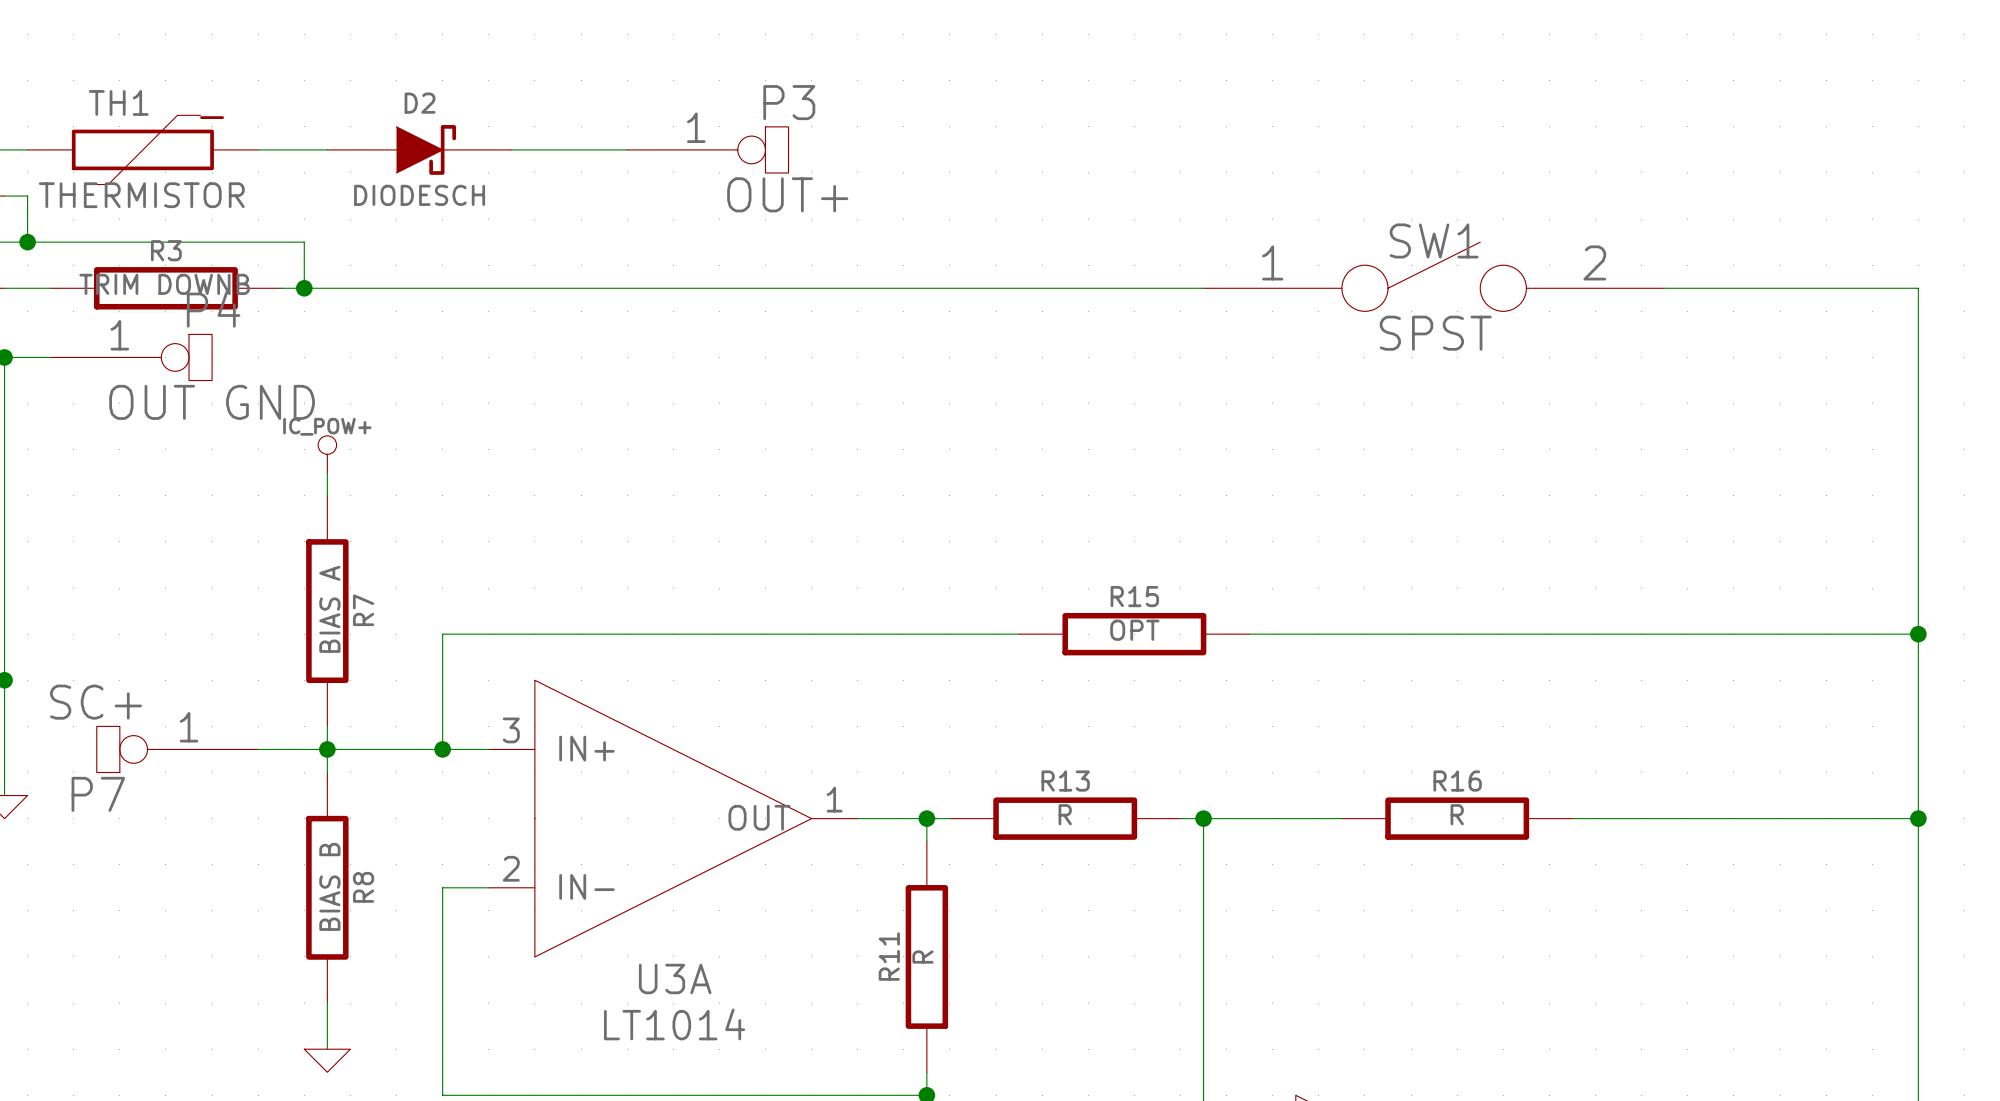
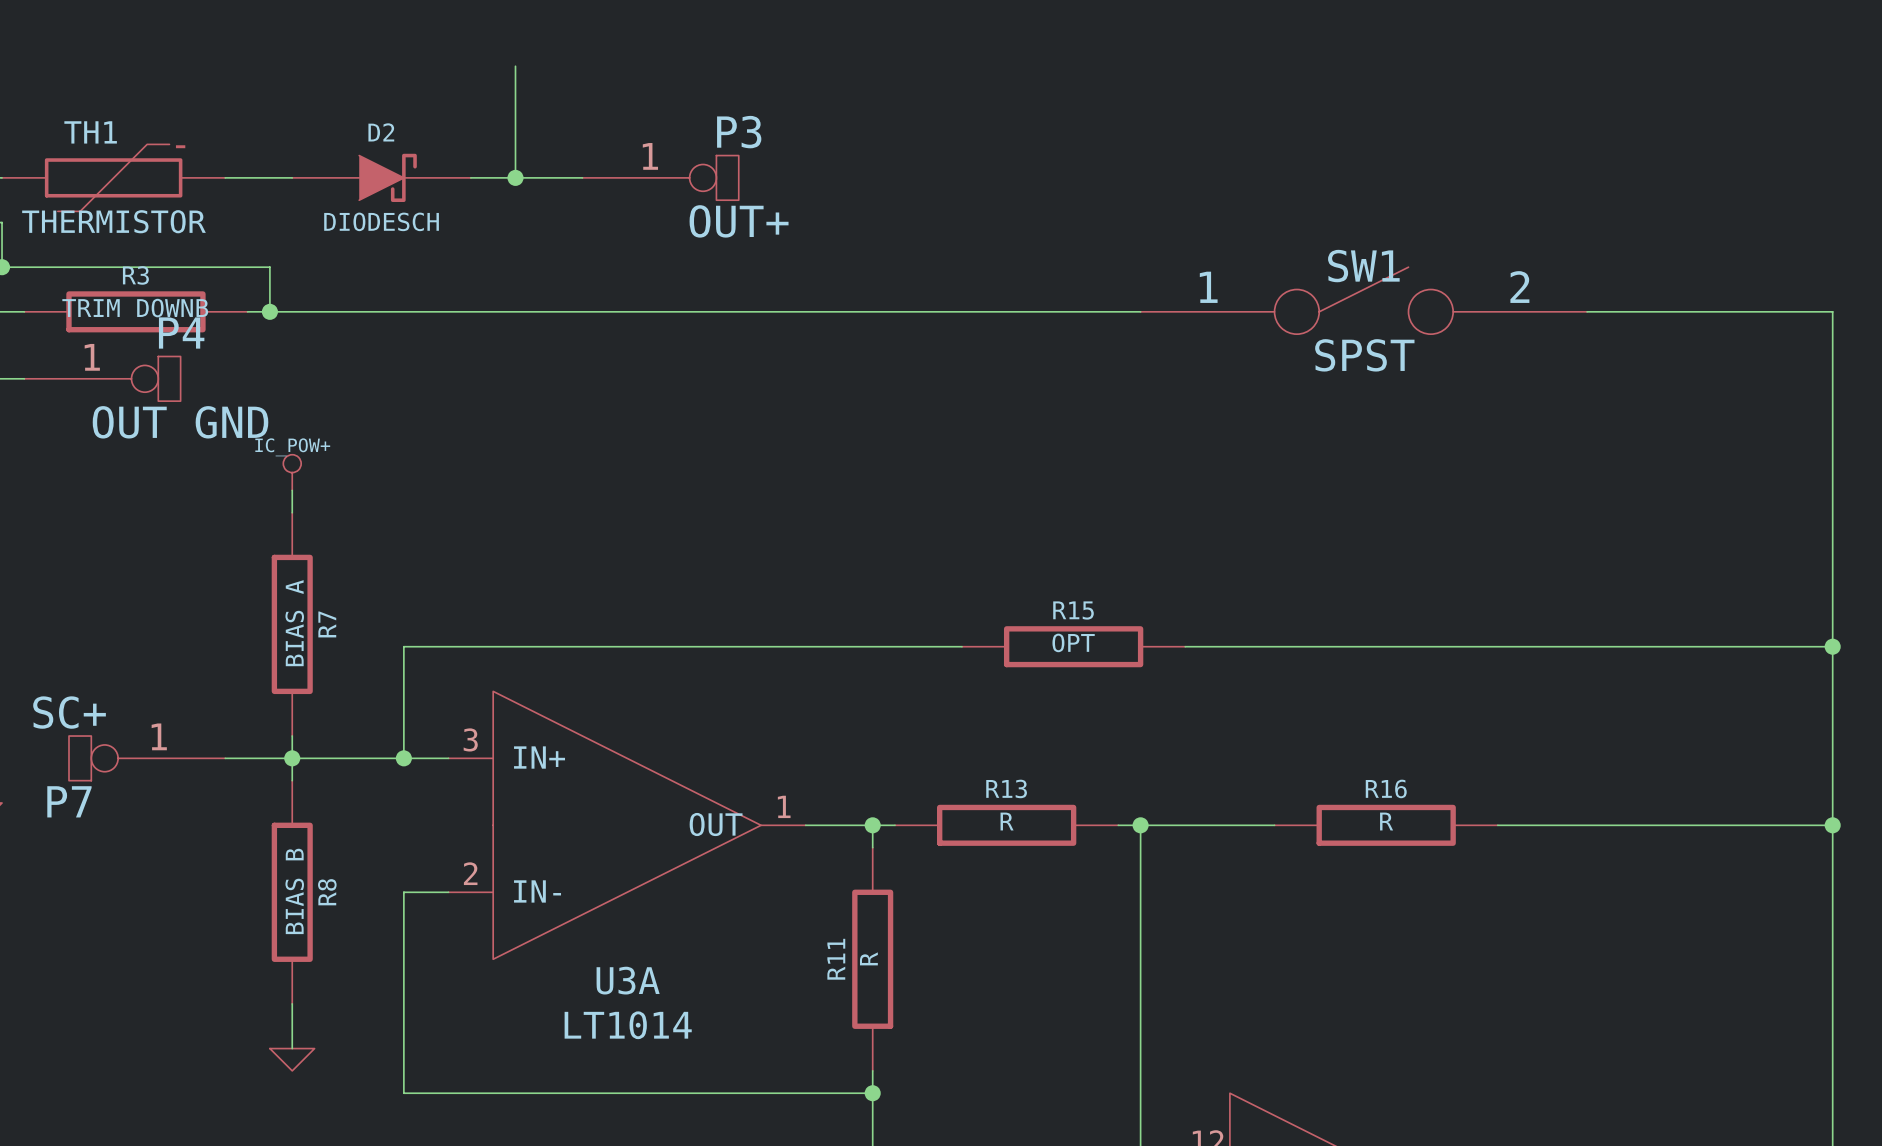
wire: none -> (515, 66) (515, 177)
junction: none -> (515, 177)

